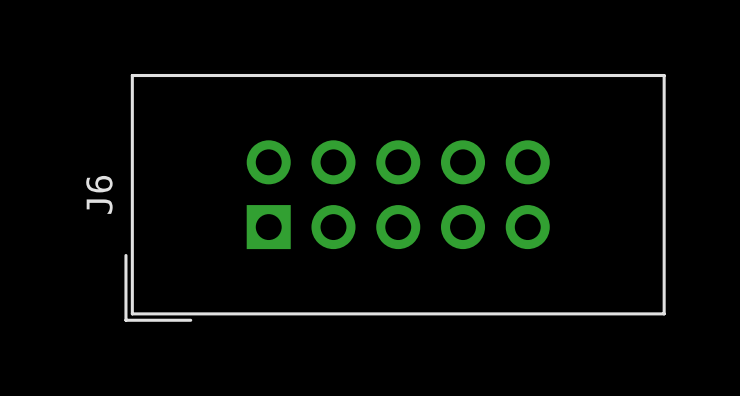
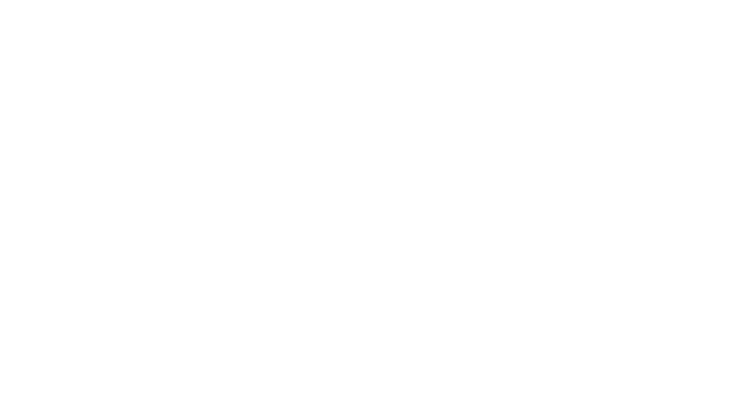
J6: (395, 197) -> none

